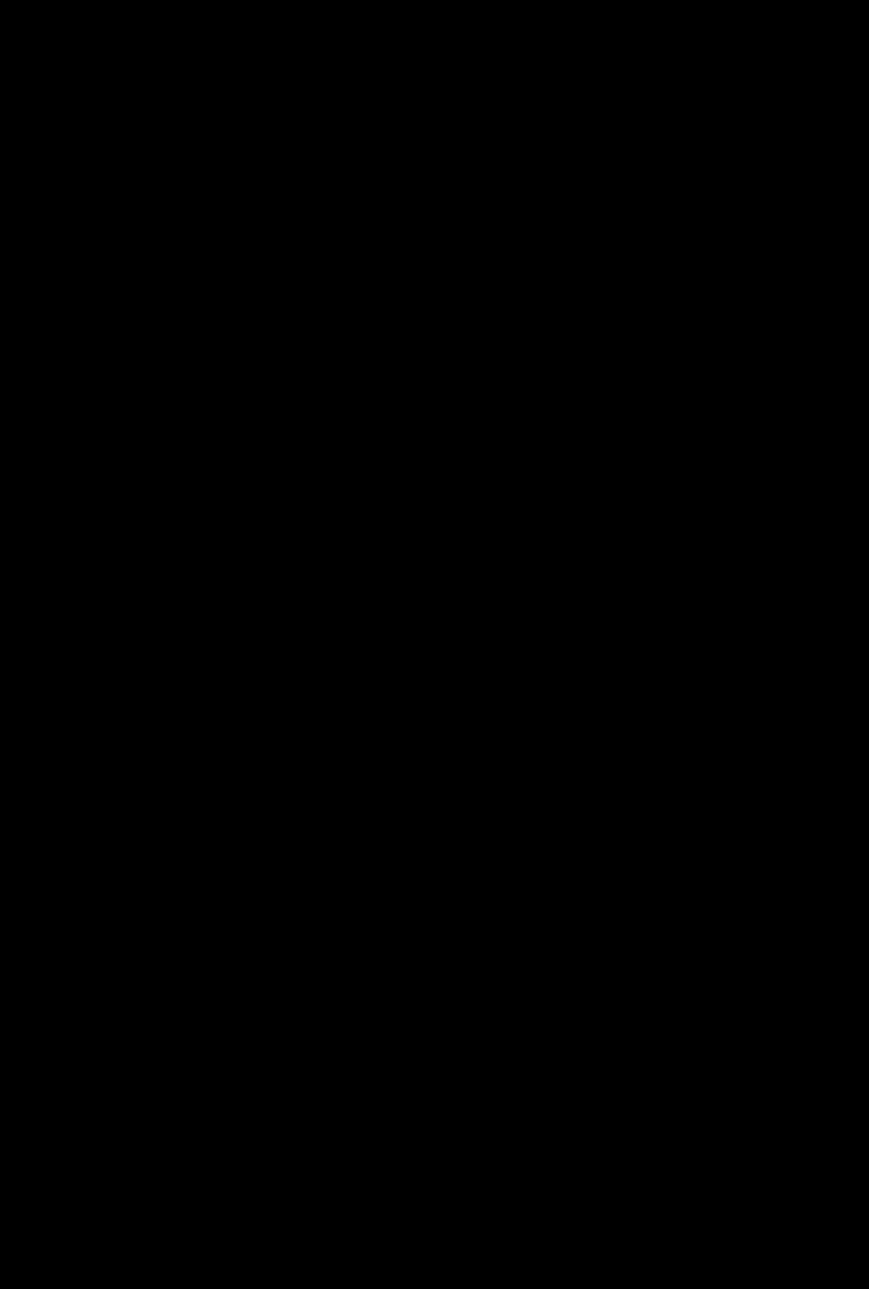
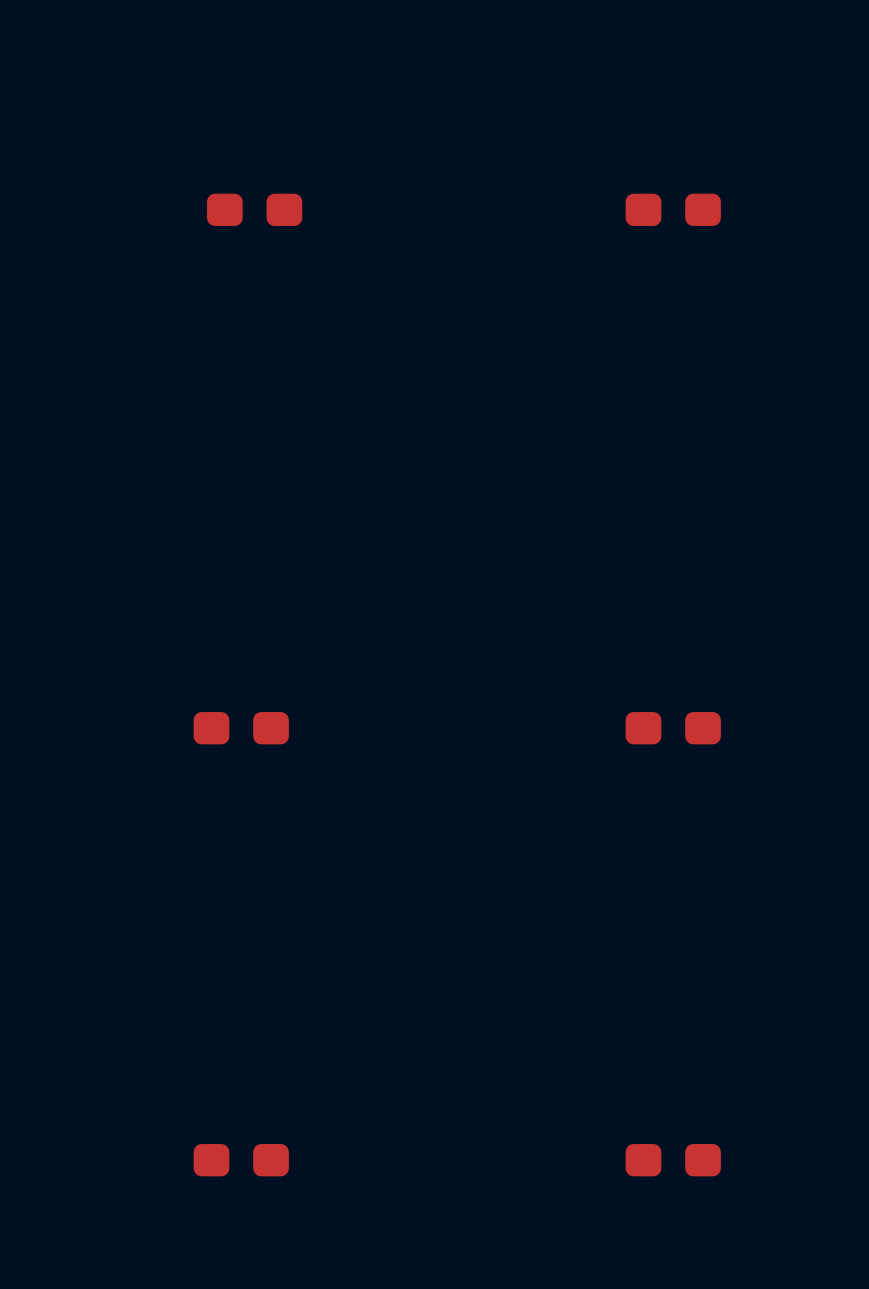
part: none -> (254, 209)
part: none -> (673, 209)
part: none -> (241, 728)
part: none -> (673, 728)
part: none -> (241, 1160)
part: none -> (673, 1160)

